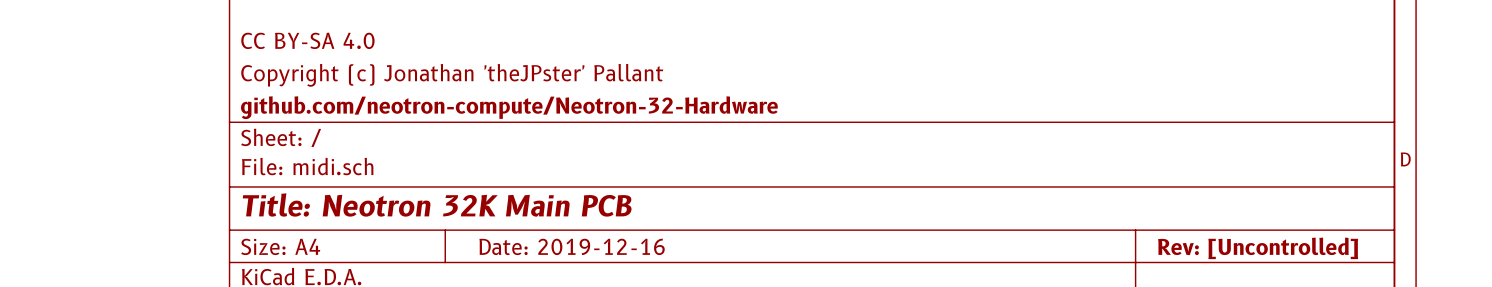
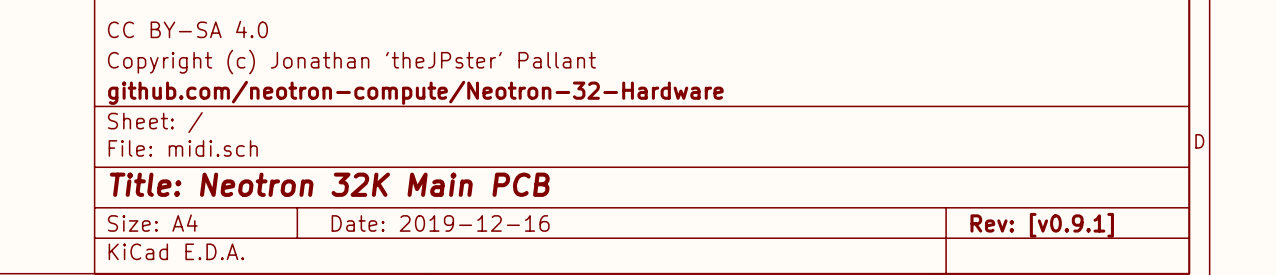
title block: Rev: [Uncontrolled] (1258, 248) -> Rev: [v0.9.1] (1042, 225)

